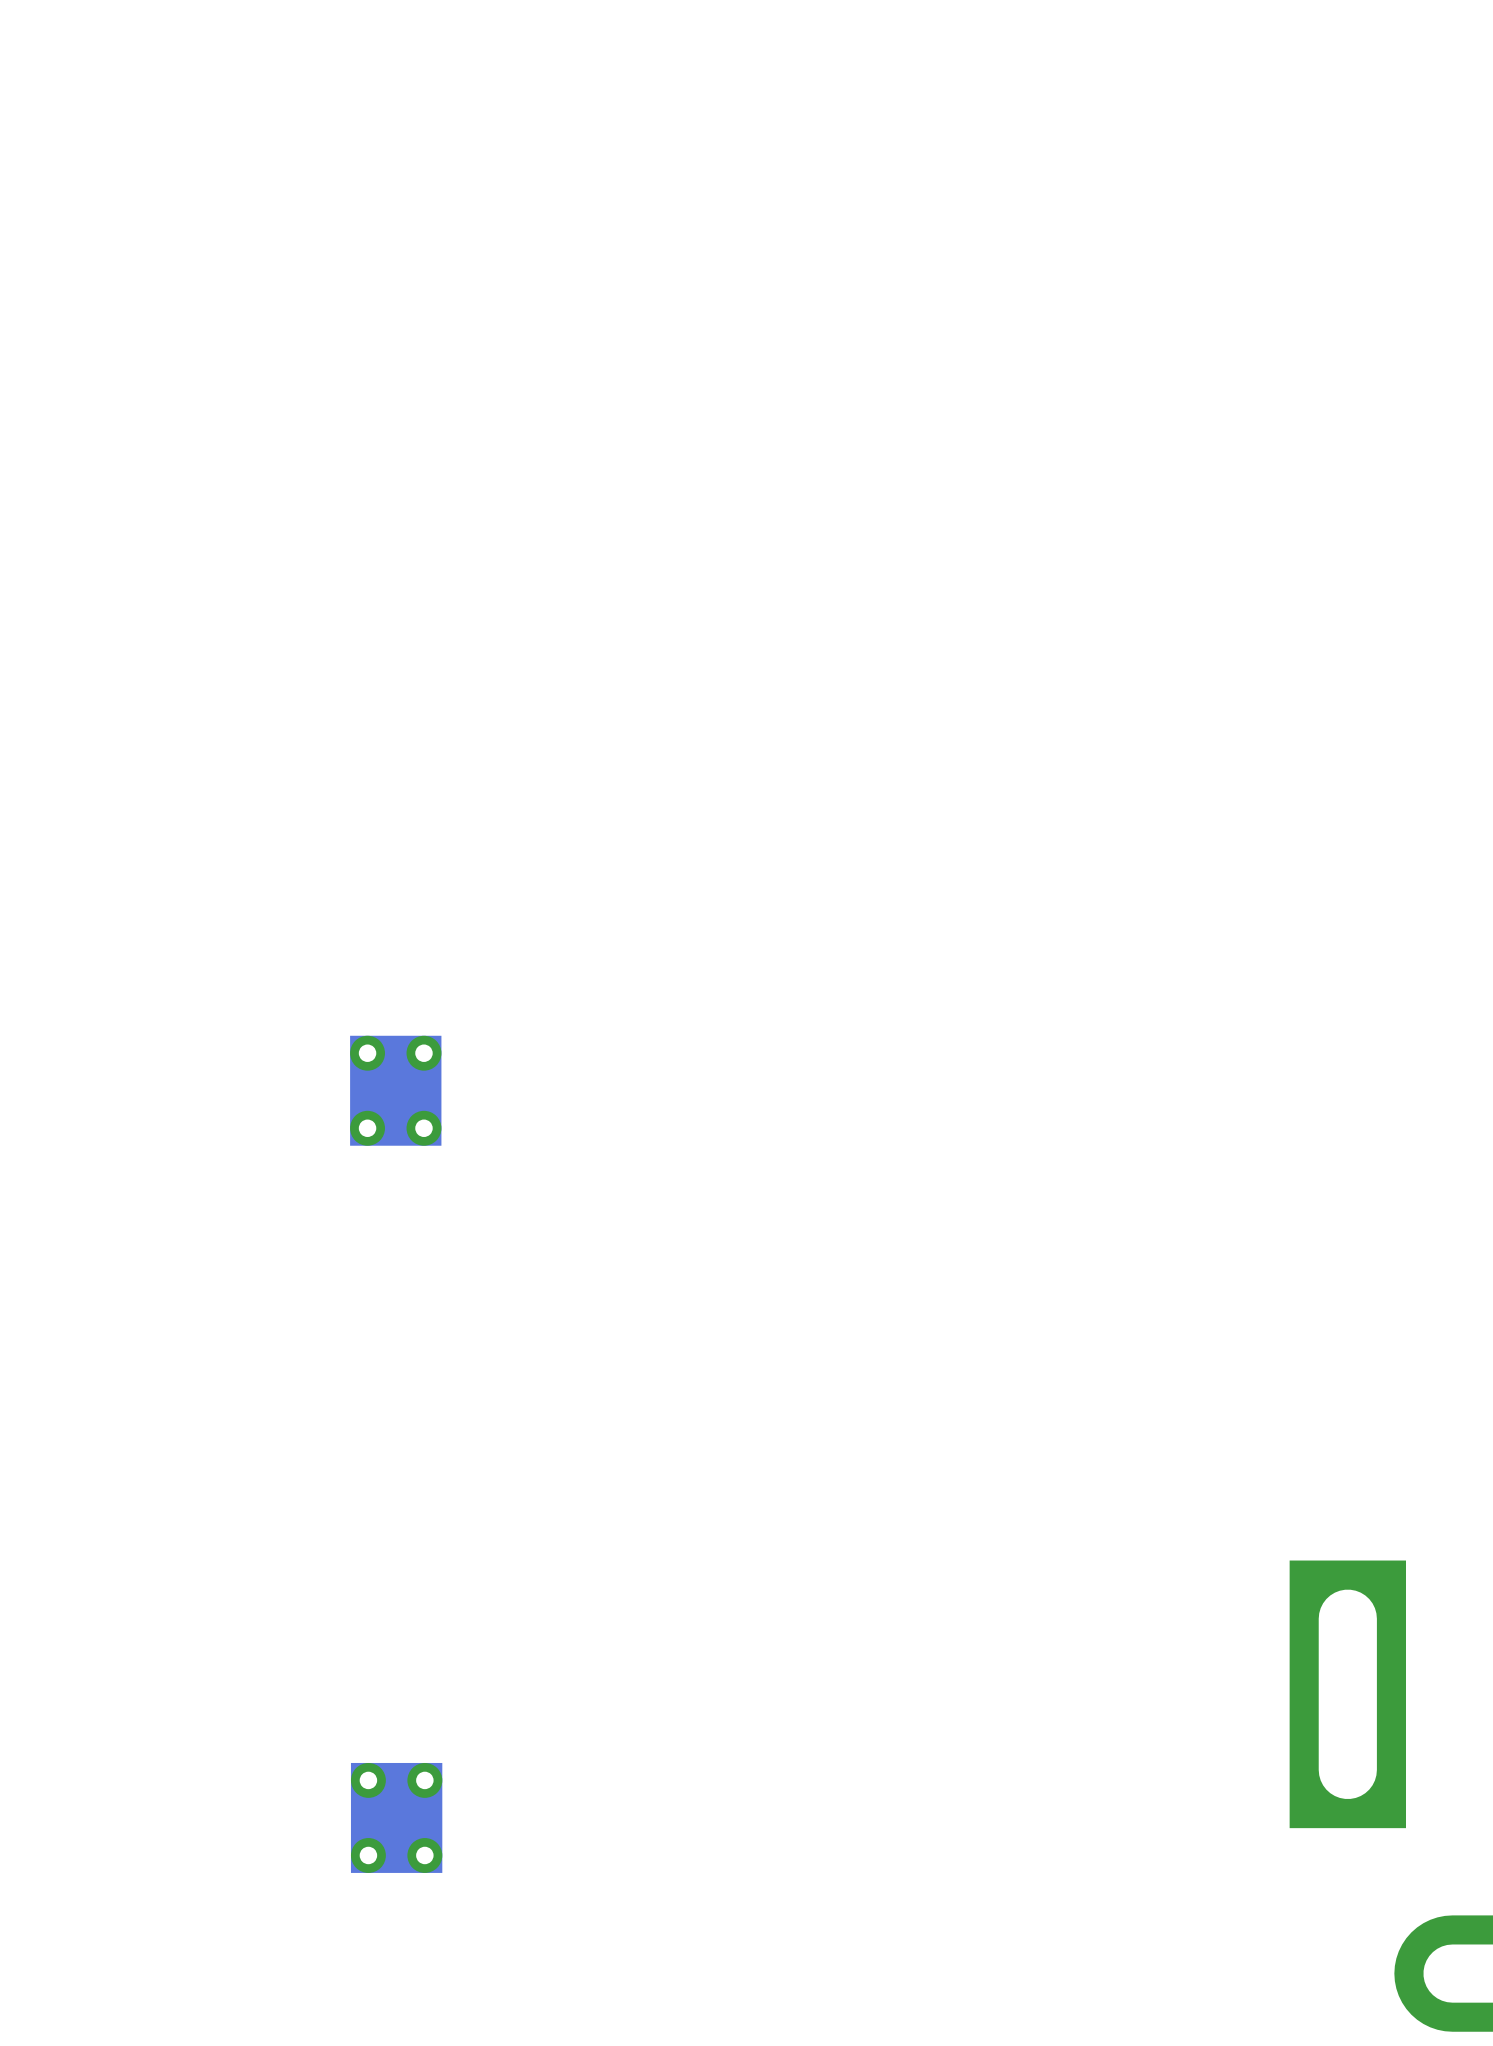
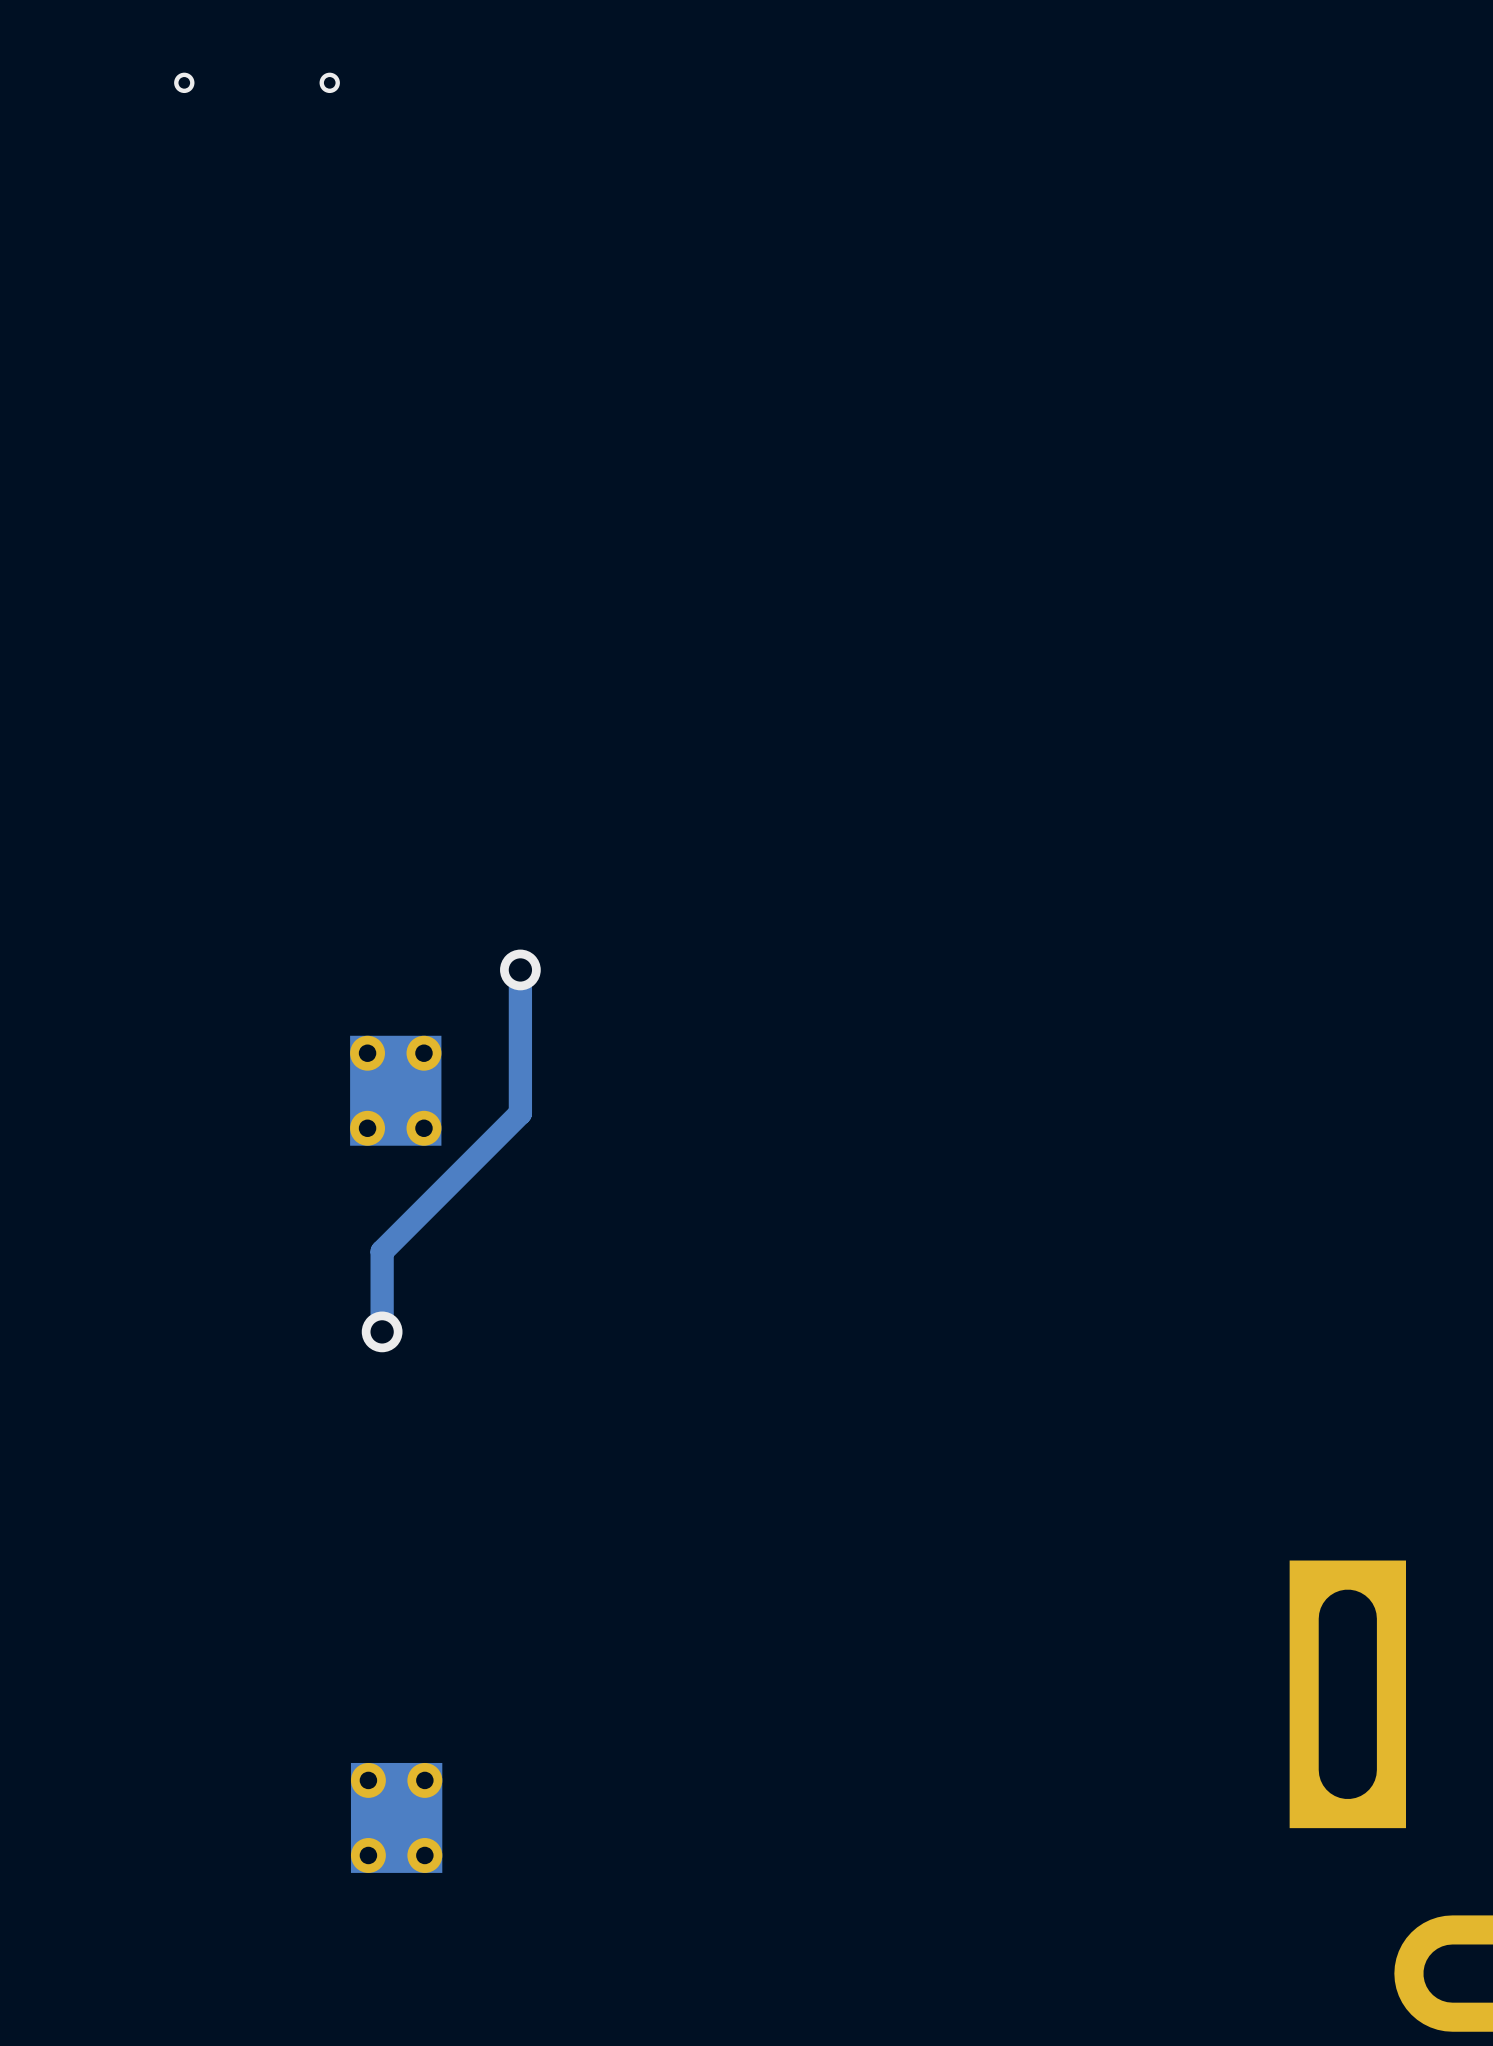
via: none -> (184, 82)
via: none -> (329, 82)
track: none -> (520, 969) (520, 1113) (382, 1251) (382, 1331)
via: none -> (520, 969)
via: none -> (382, 1331)

